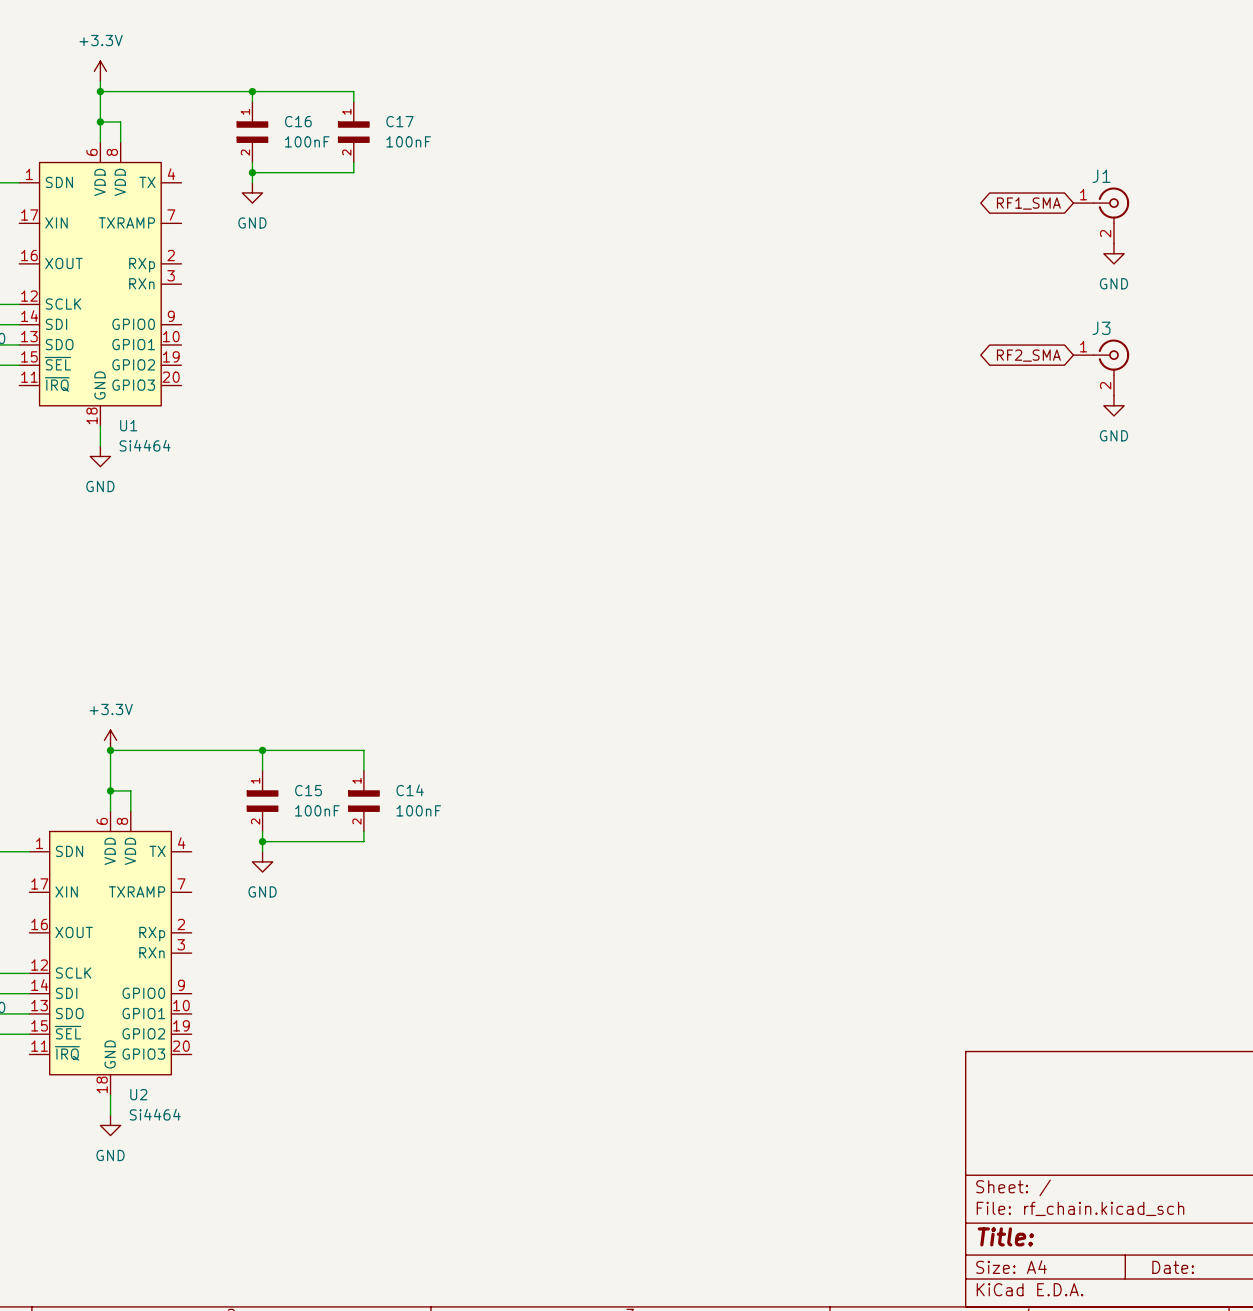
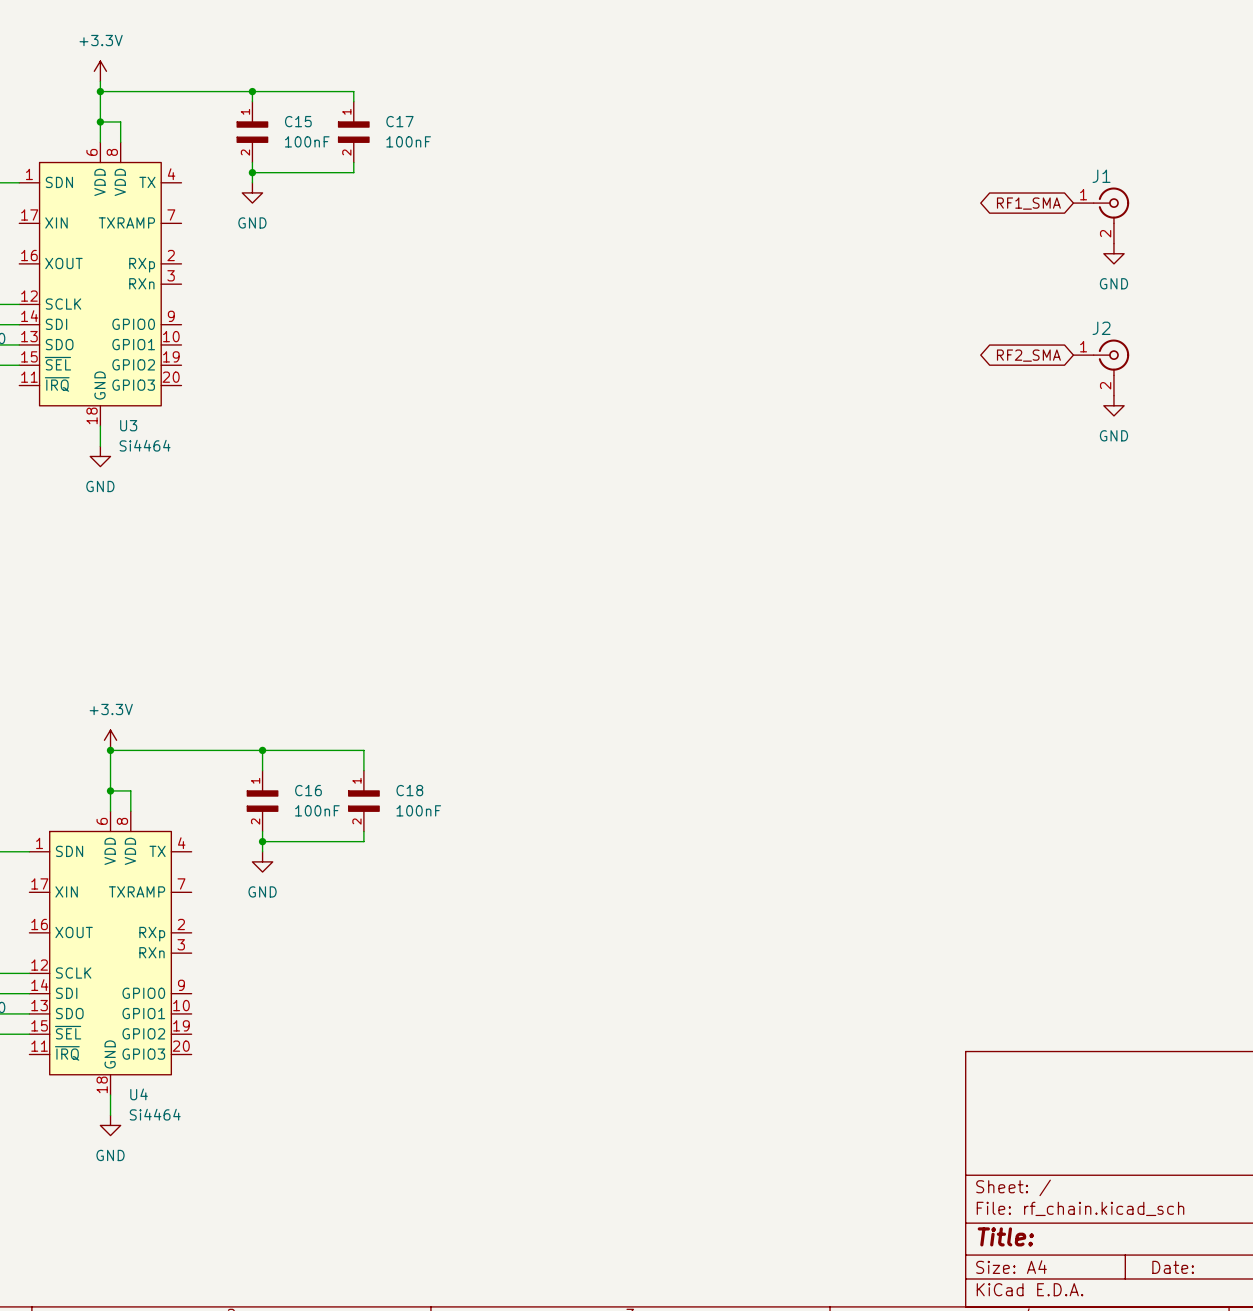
C16 name: C16 (298, 121) -> C15 (298, 121)
J3 name: J3 (1101, 328) -> J2 (1101, 328)
U1 name: U1 (128, 425) -> U3 (128, 425)
C15 name: C15 (308, 790) -> C16 (308, 790)
C14 name: C14 (410, 790) -> C18 (409, 790)
U2 name: U2 (138, 1094) -> U4 (139, 1094)

